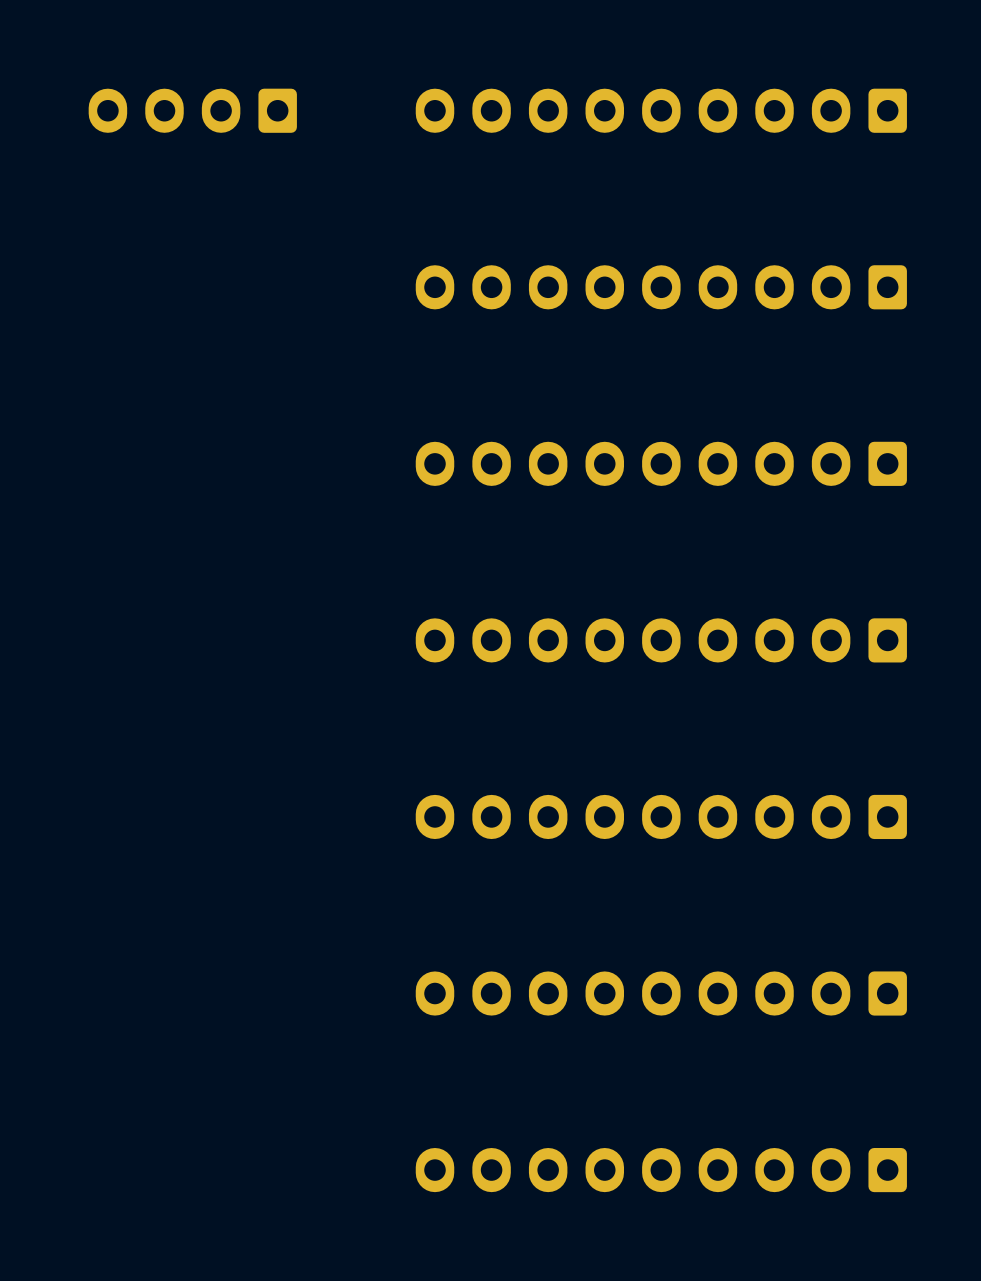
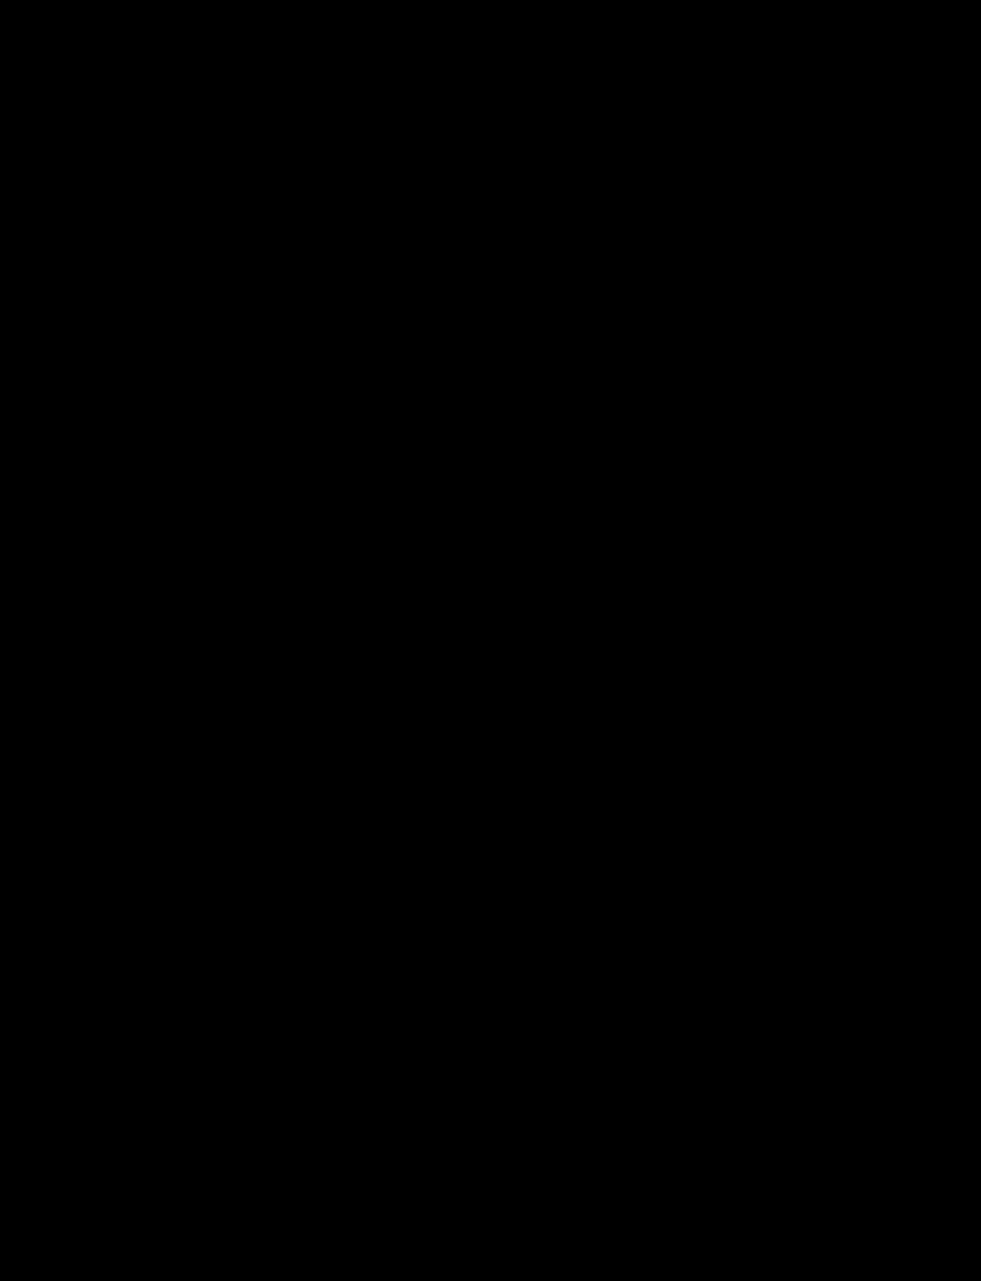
part: (192, 110) -> none
part: (661, 110) -> none
part: (661, 287) -> none
part: (661, 463) -> none
part: (661, 640) -> none
part: (661, 816) -> none
part: (661, 993) -> none
part: (661, 1170) -> none

